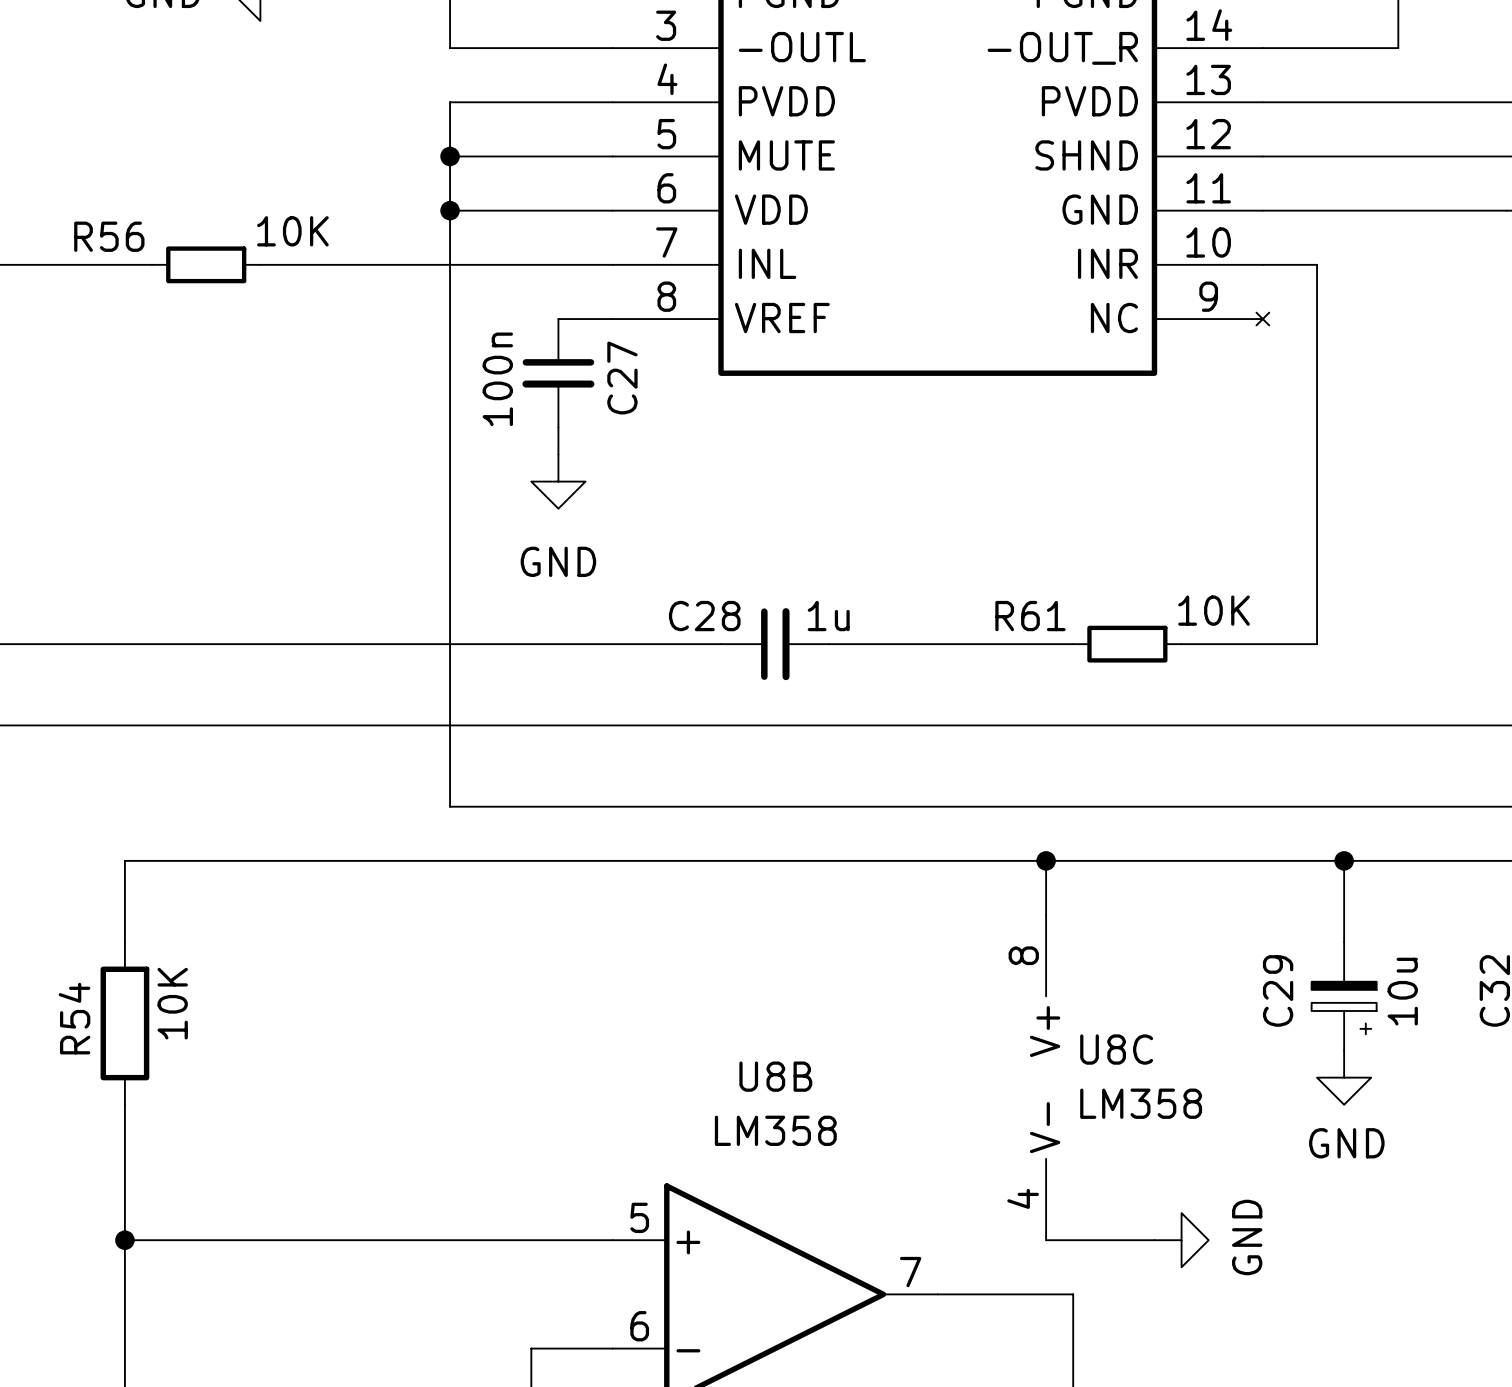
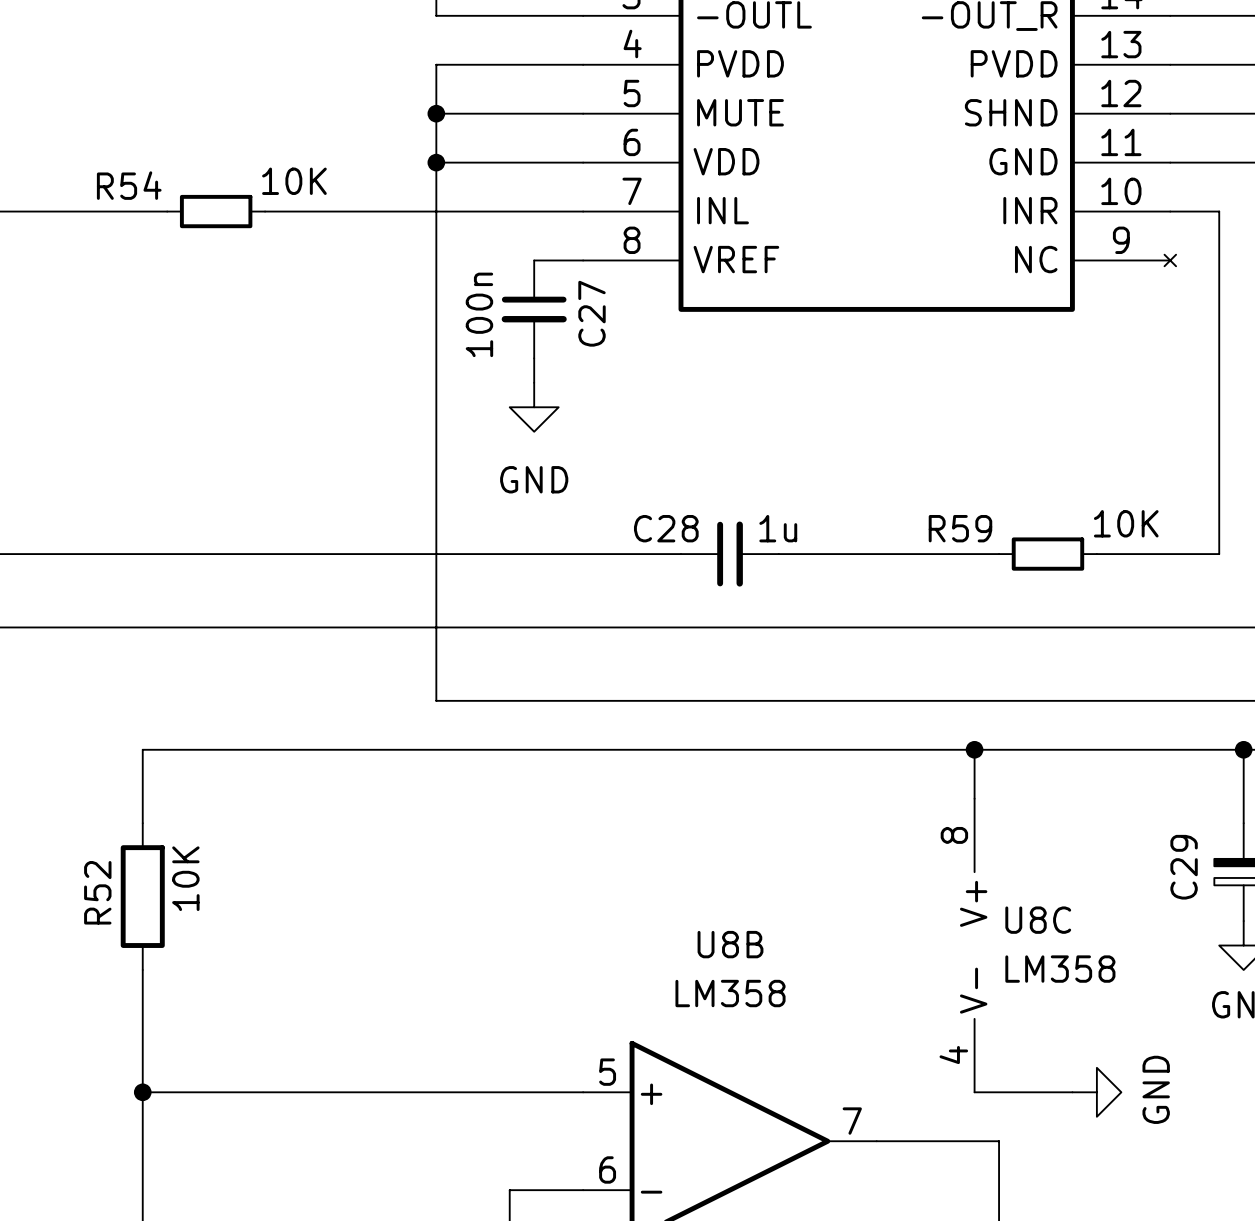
R56 name: R56 (109, 236) -> R54 (129, 185)
R61 name: R61 (1030, 616) -> R59 (960, 528)
R54 name: R54 (74, 1018) -> R52 (97, 892)

